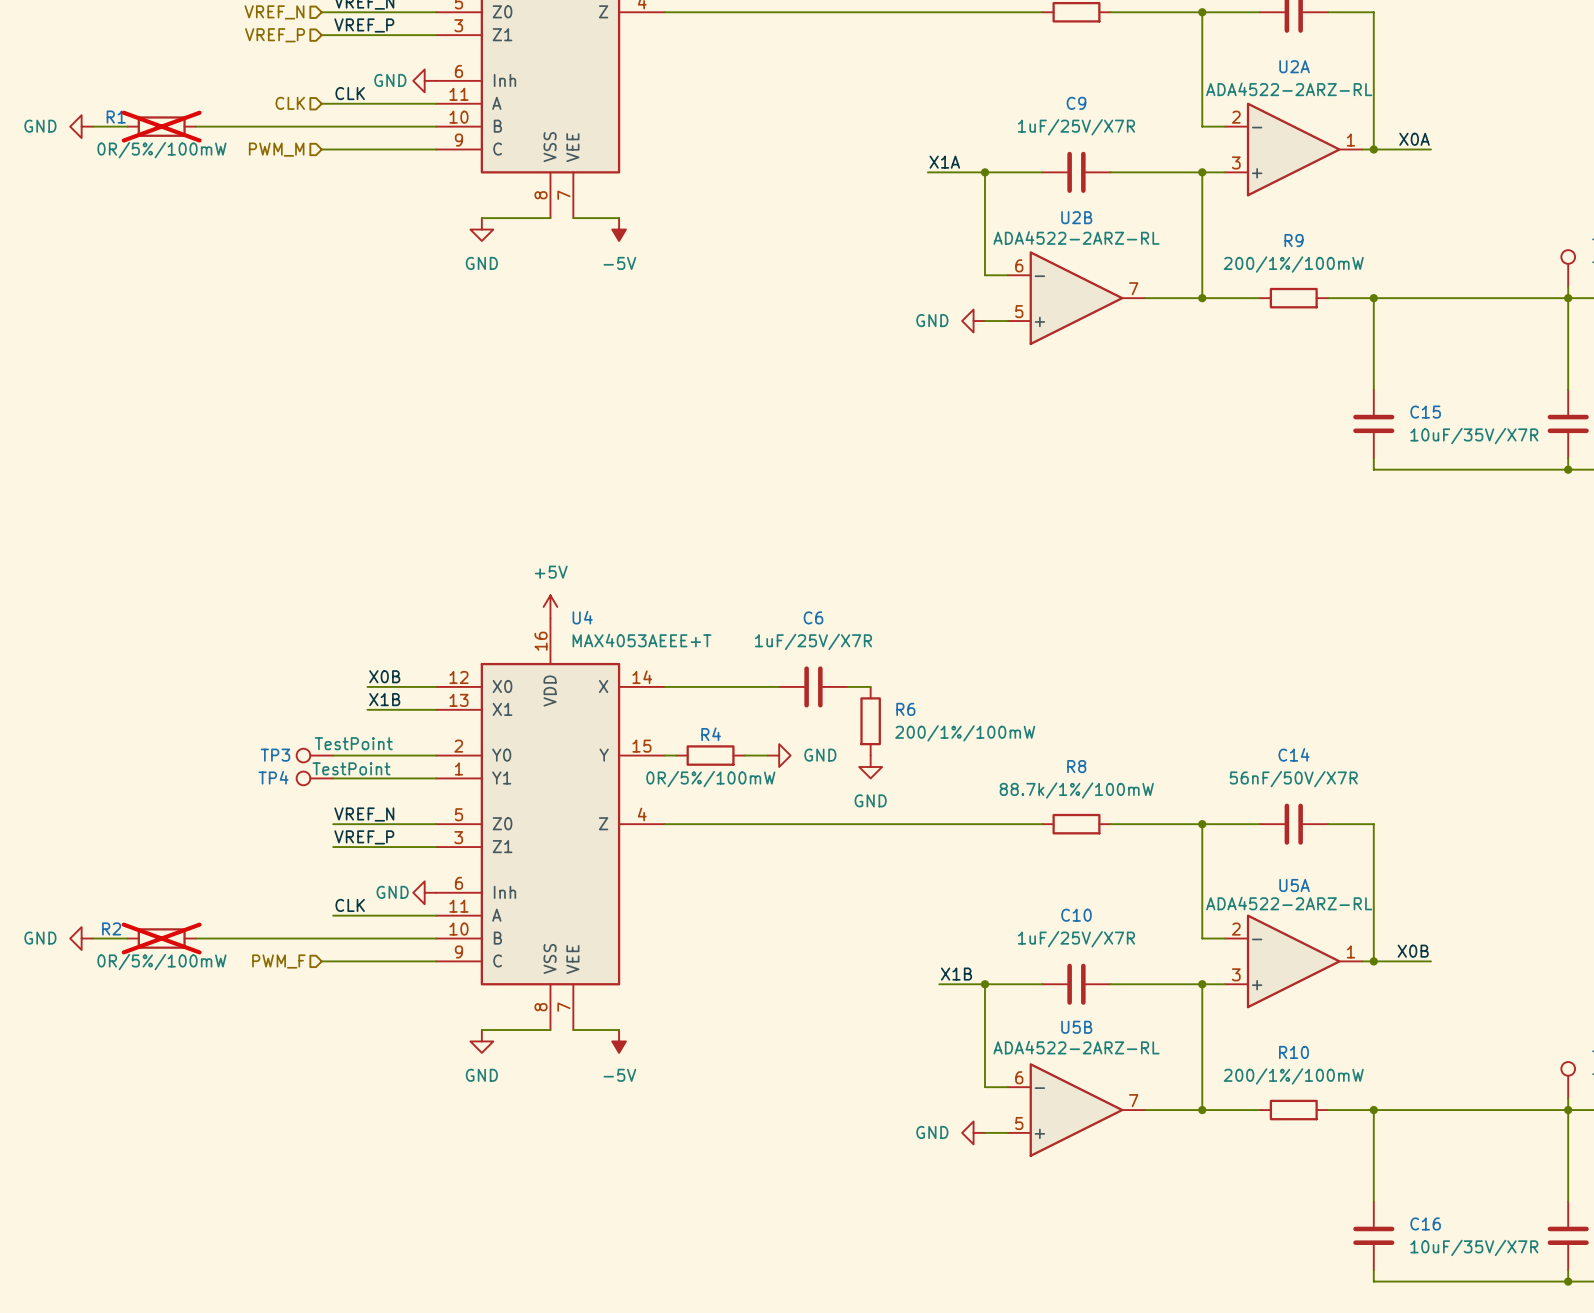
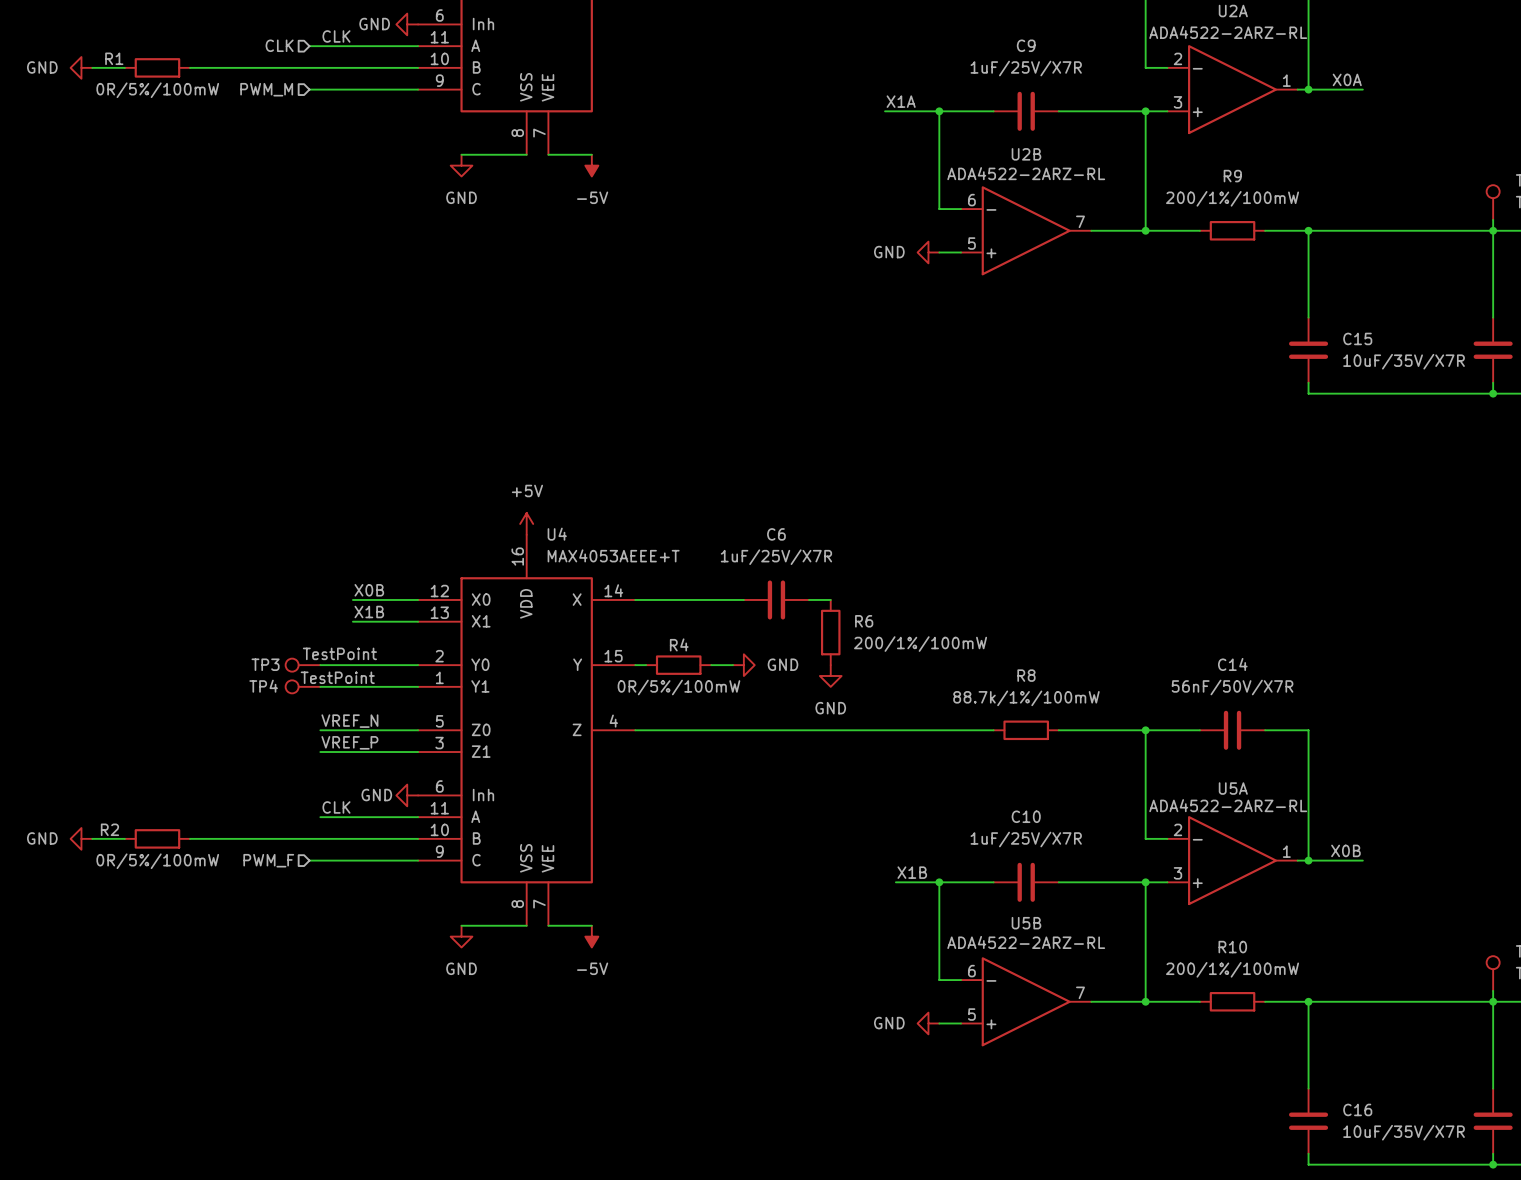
R1 do-not-place cross: (161, 126) -> none
R2 do-not-place cross: (161, 938) -> none

